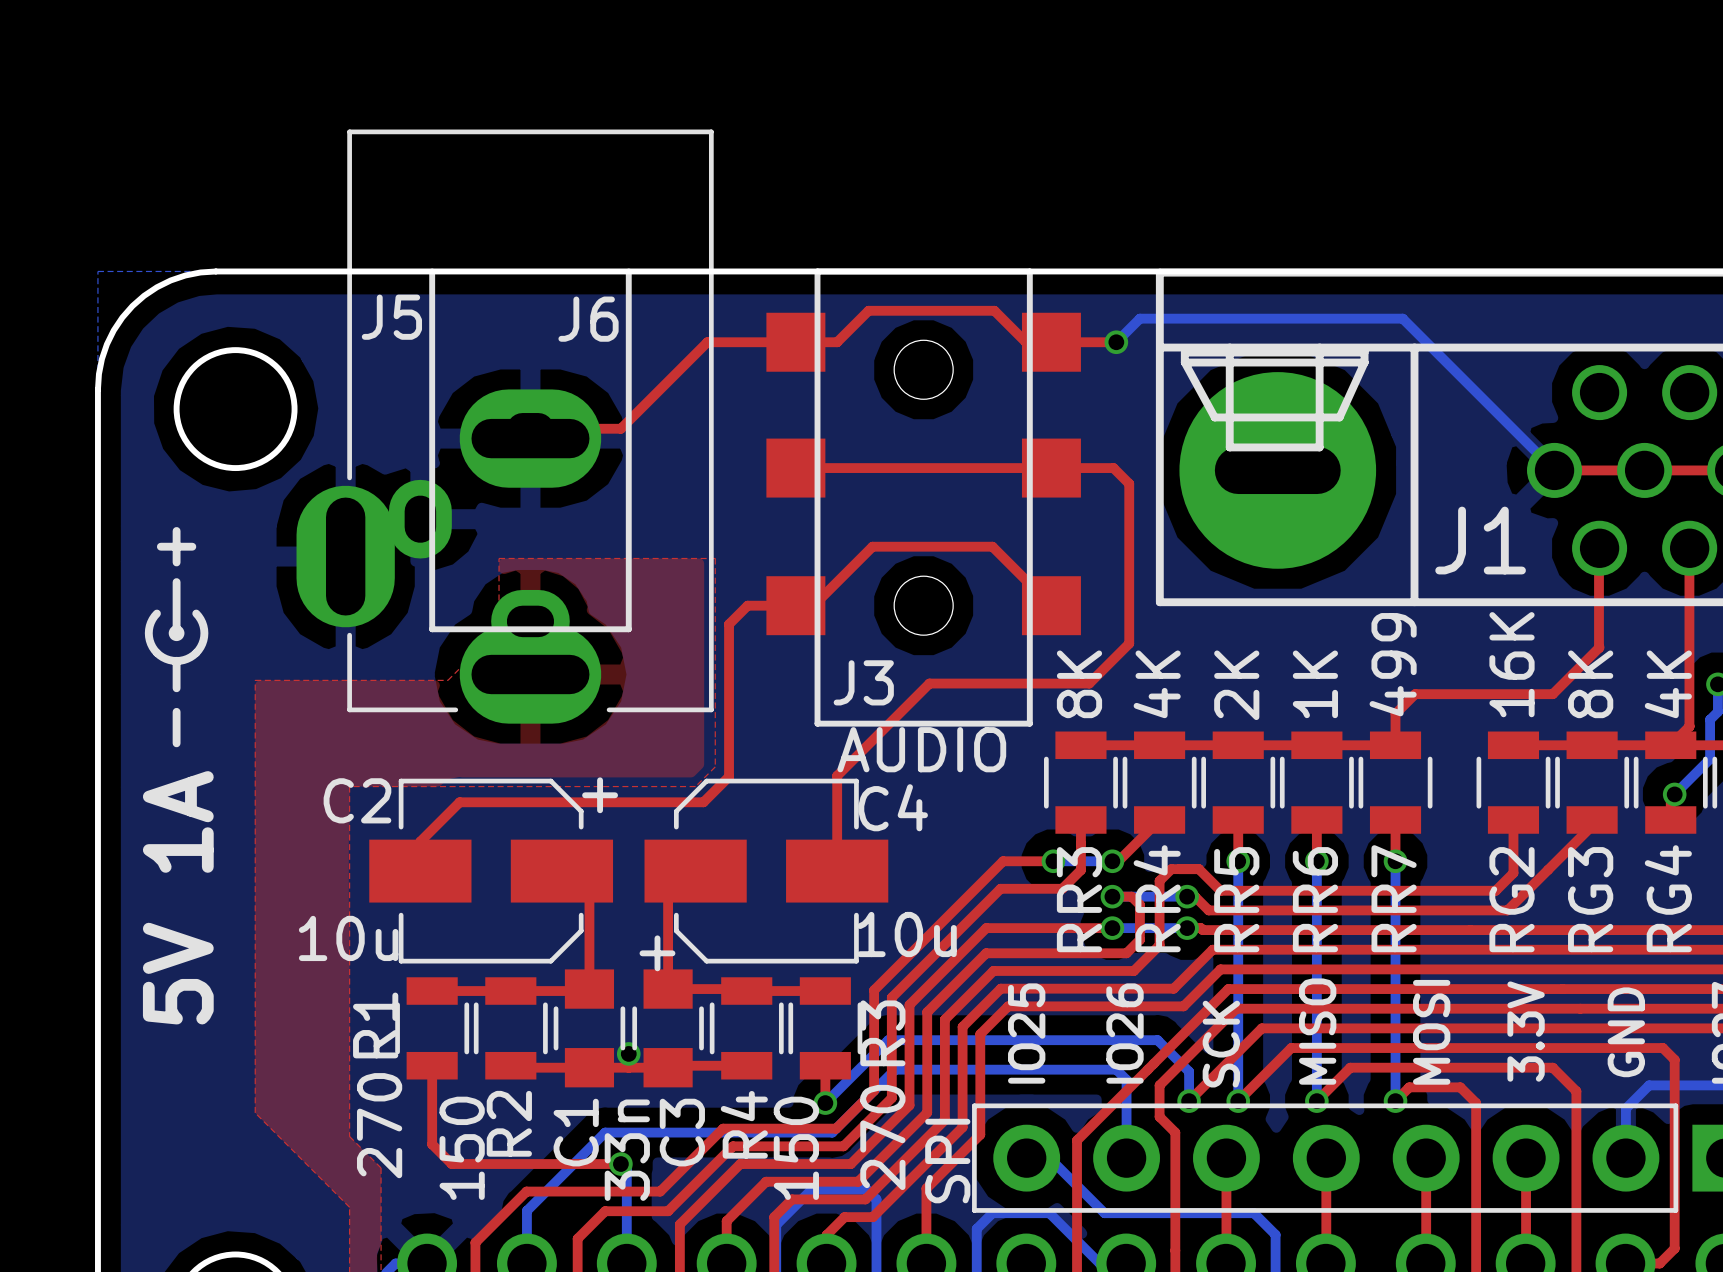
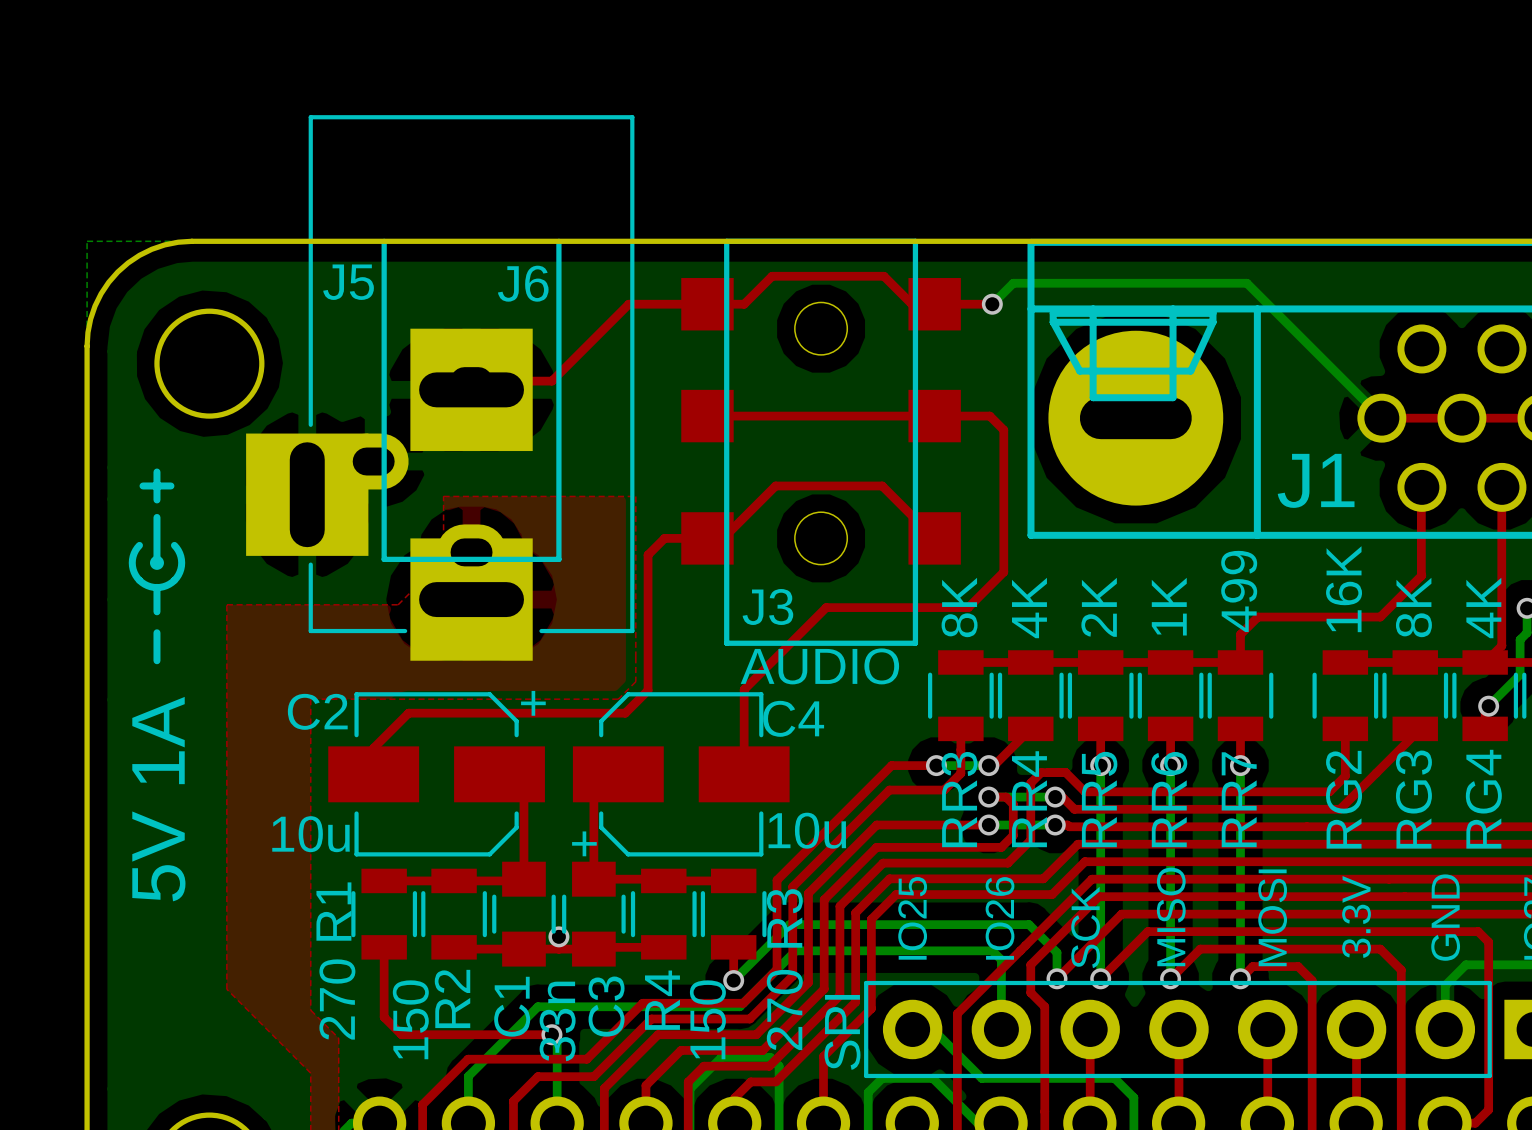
J5 footprint: [296, 129, 714, 724] -> [246, 115, 635, 661]
J6 footprint: [388, 268, 632, 653] -> [338, 238, 562, 581]

